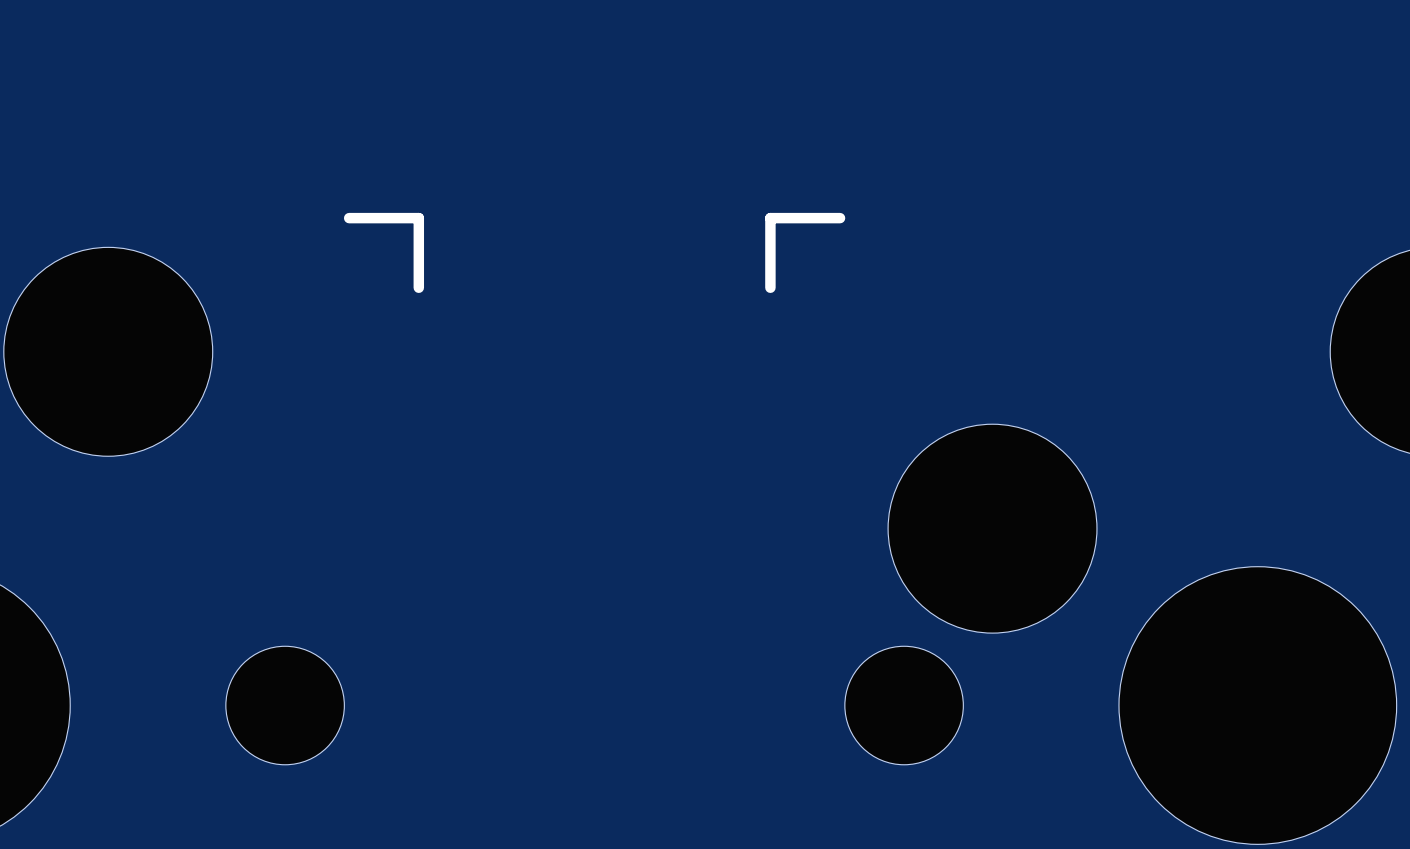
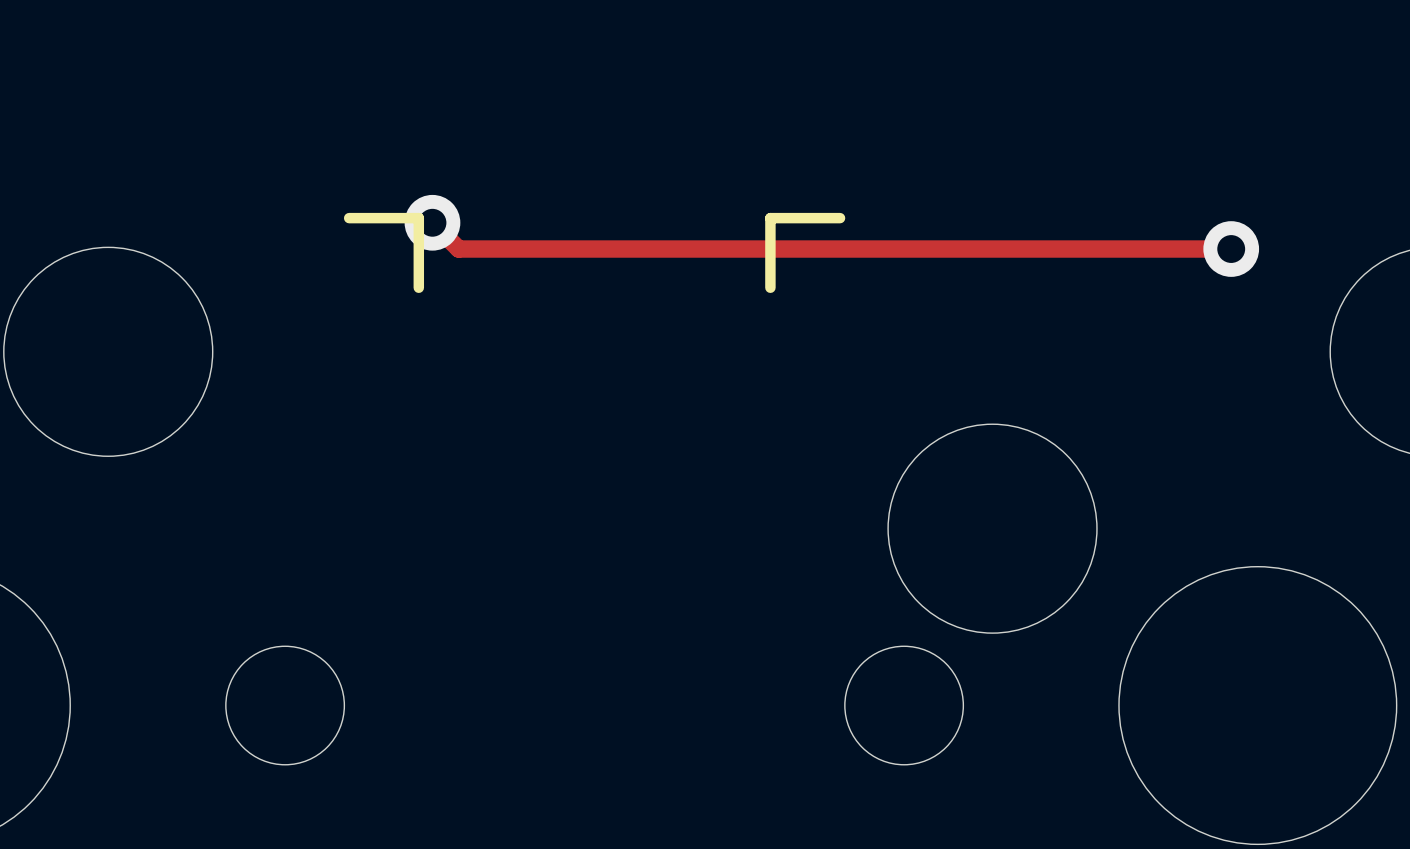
track: none -> (432, 222) (458, 249) (1231, 249)
via: none -> (432, 222)
via: none -> (1231, 249)

